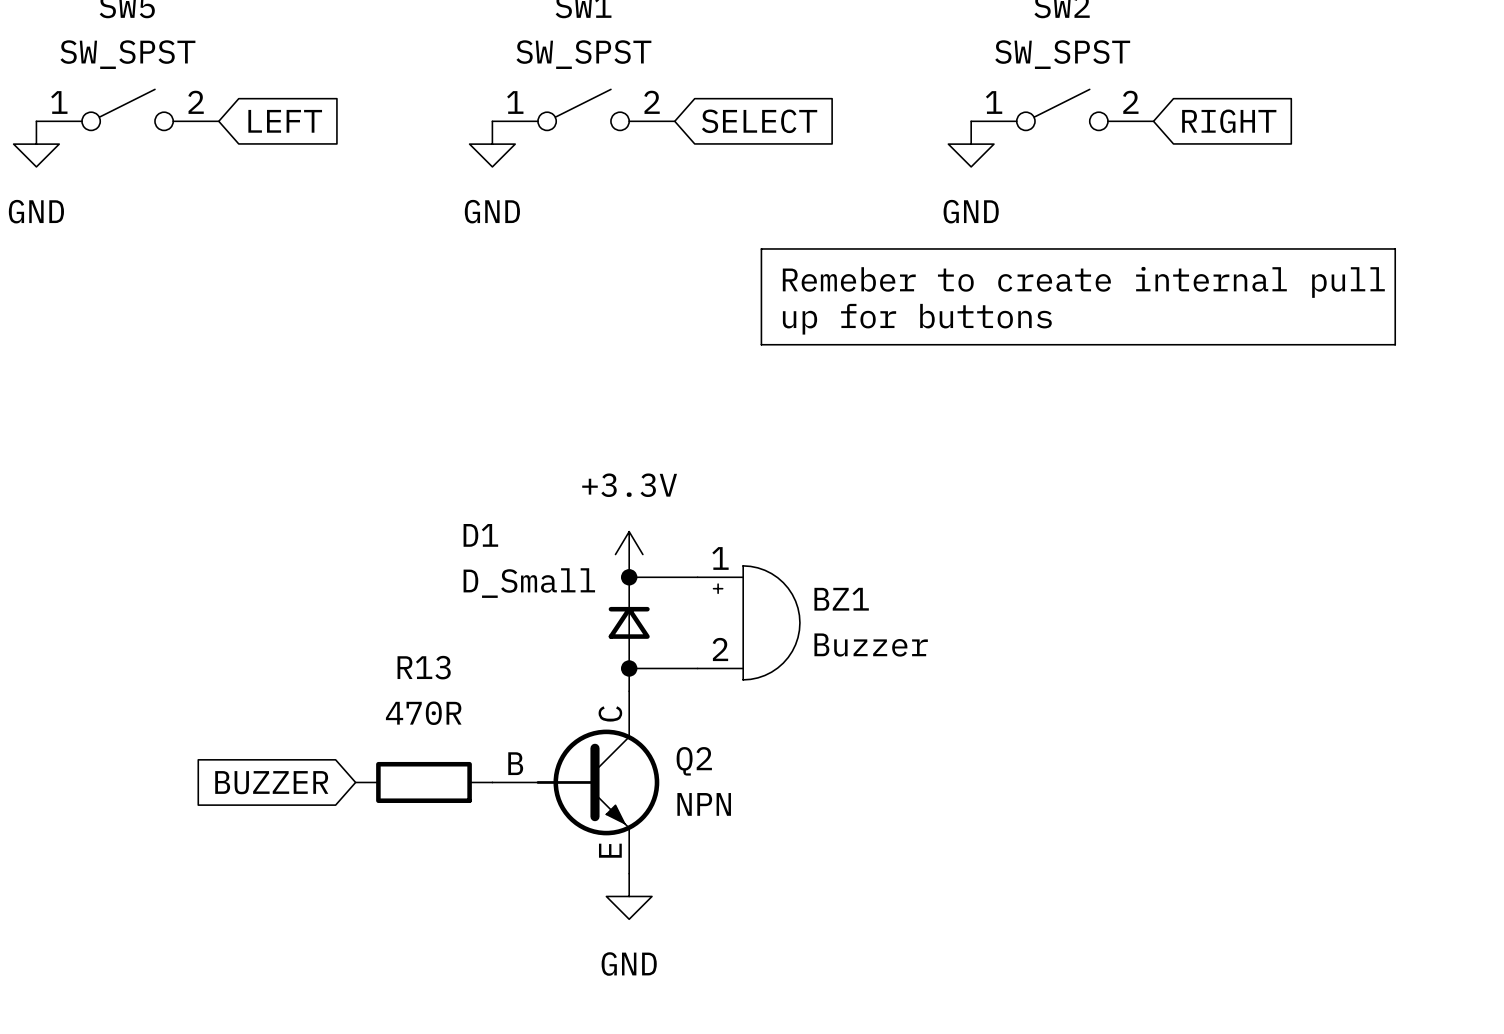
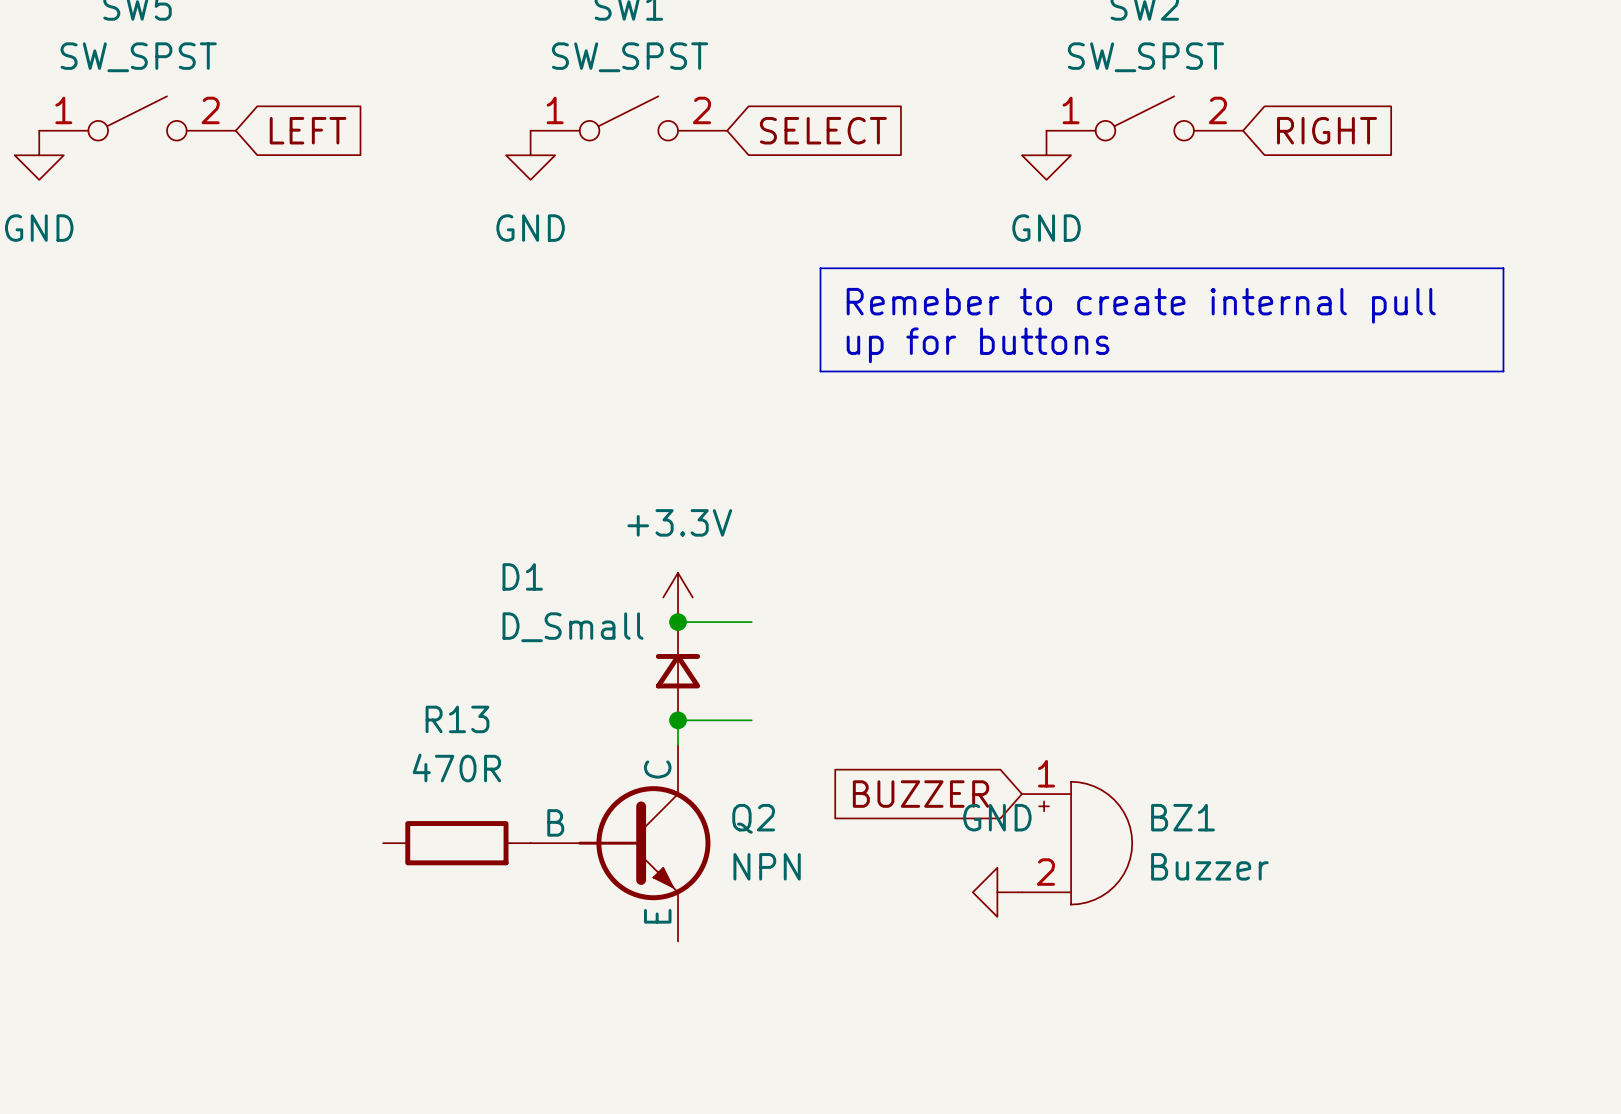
BZ1 position: (748, 622) -> (1077, 843)
global label: none -> BUZZER (921, 794)
global label: BUZZER (271, 782) -> none
power symbol rotation: 0° (629, 896) -> 90° clockwise (997, 892)
power symbol position: GND (629, 896) -> GND (997, 892)
power symbol text position: GND (629, 964) -> GND (997, 817)

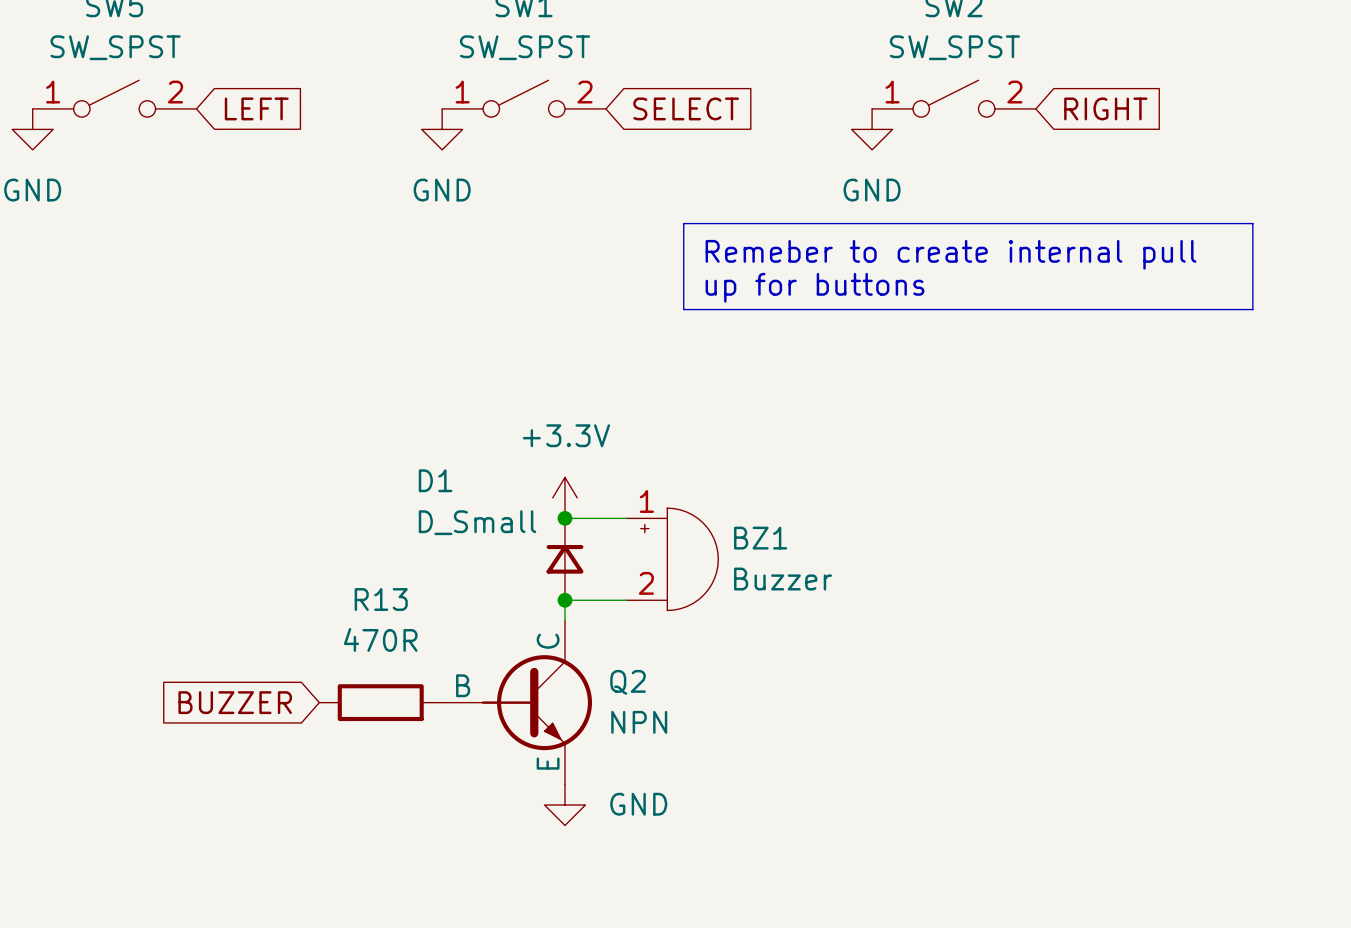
global label: BUZZER (921, 794) -> none
power symbol text position: GND (997, 817) -> GND (638, 804)
global label: none -> BUZZER (235, 702)
BZ1 position: (1077, 843) -> (672, 559)
power symbol rotation: 0° (997, 892) -> 90° counterclockwise (564, 804)
power symbol position: GND (997, 892) -> GND (564, 804)

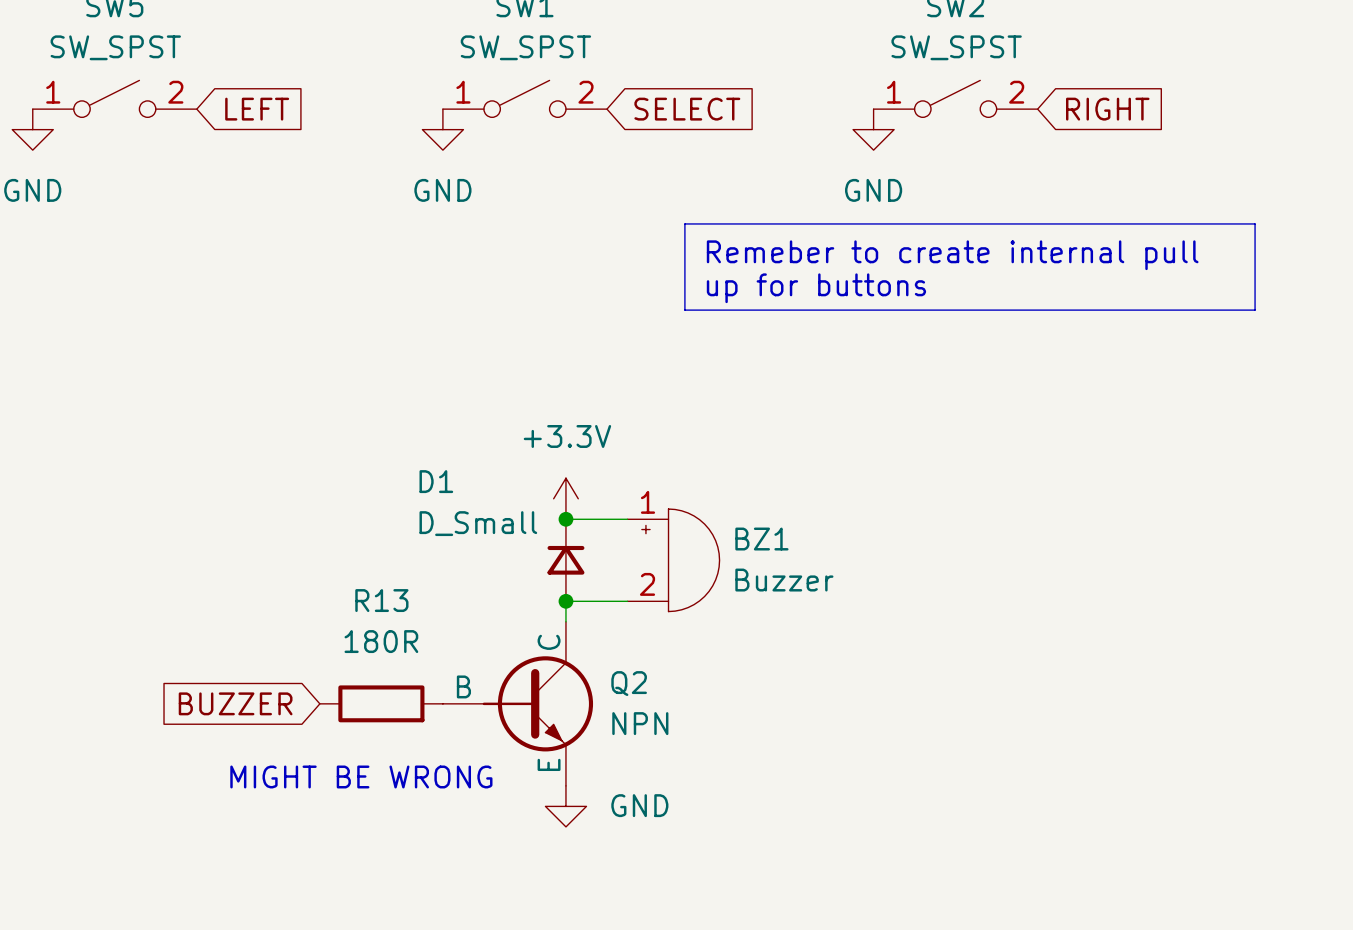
R13 value: 470R (380, 639) -> 180R (381, 641)
text: none -> MIGHT BE WRONG (361, 776)

